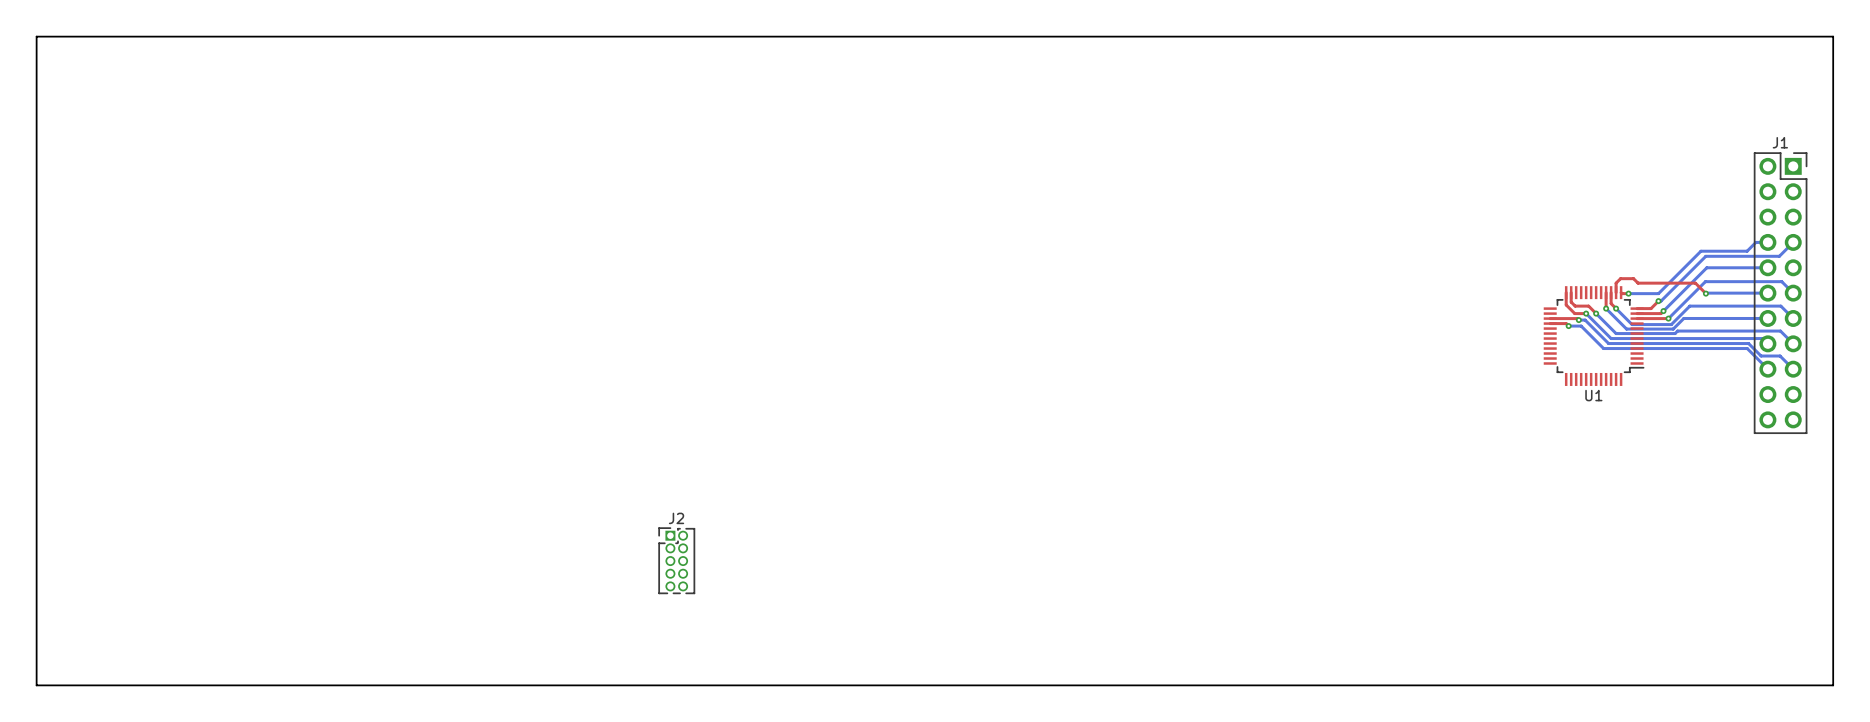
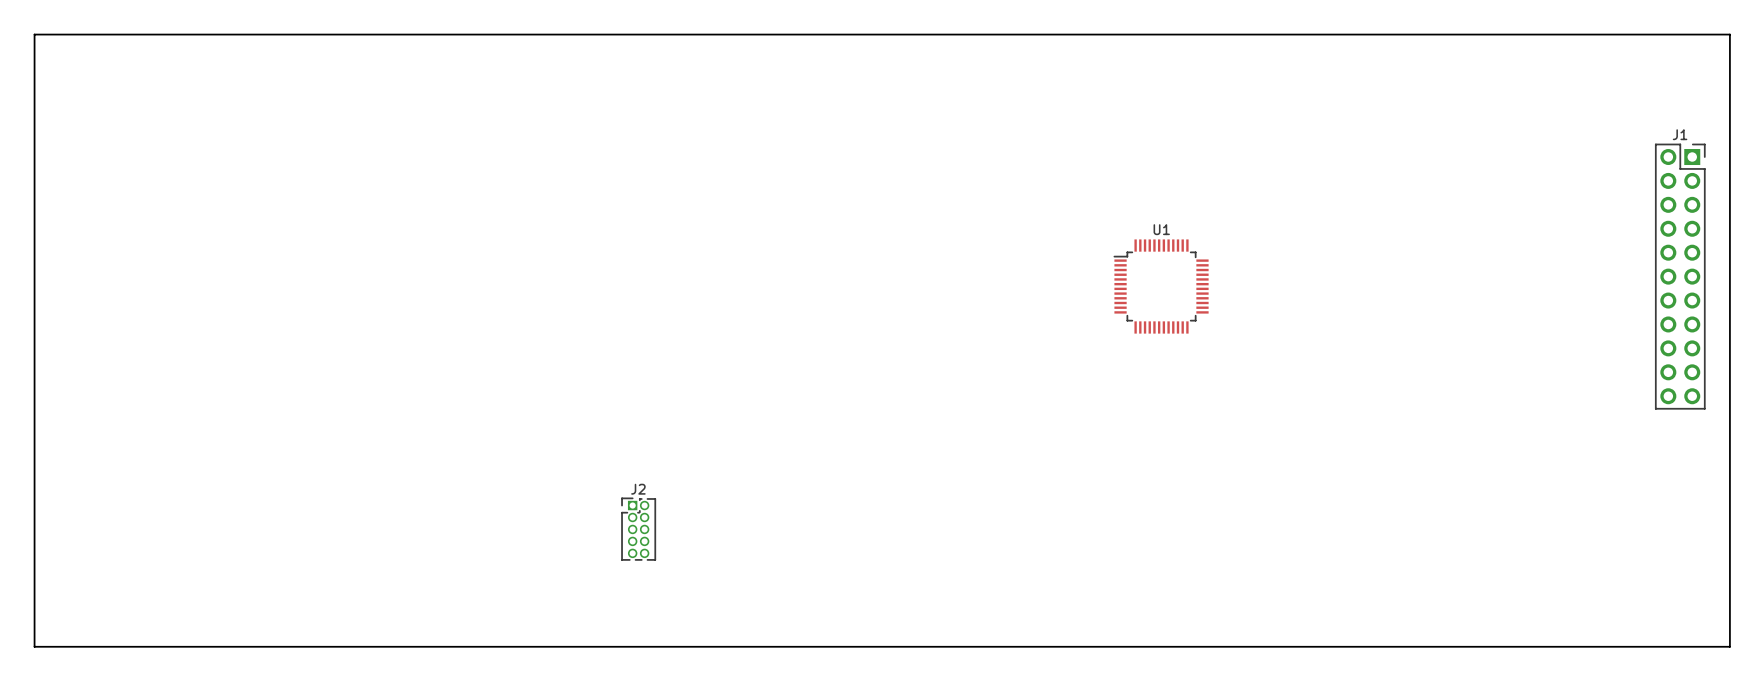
bottom track: (1767, 242) (1755, 242) (1747, 251) (1700, 251) (1658, 293) (1628, 293) -> none
bottom track: (1793, 242) (1779, 256) (1705, 256) (1661, 301) (1658, 301) -> none
bottom track: (1767, 267) (1706, 267) (1663, 311) -> none
top track: (1566, 292) (1566, 304) (1574, 313) (1586, 313) -> none
top track: (1571, 292) (1571, 302) (1575, 306) (1588, 306) (1596, 313) -> none
top track: (1606, 292) (1606, 308) -> none
top track: (1611, 292) (1611, 303) (1616, 308) -> none
top track: (1616, 292) (1616, 283) (1620, 278) (1633, 278) (1638, 283) (1695, 283) (1705, 293) -> none
top track: (1621, 292) (1628, 293) -> none
via: (1628, 293) -> none
via: (1705, 293) -> none
bottom track: (1767, 293) (1705, 293) -> none
bottom track: (1793, 293) (1781, 281) (1705, 281) (1668, 318) -> none
top track: (1658, 301) (1651, 308) (1637, 308) -> none
via: (1658, 301) -> none
bottom track: (1606, 308) (1626, 329) (1673, 329) (1683, 318) (1767, 318) -> none
via: (1606, 308) -> none
bottom track: (1616, 308) (1632, 324) (1671, 324) (1689, 306) (1780, 306) (1793, 318) -> none
via: (1616, 308) -> none
top track: (1663, 311) (1661, 313) (1637, 313) -> none
via: (1663, 311) -> none
bottom track: (1586, 313) (1611, 338) (1762, 338) (1767, 343) -> none
via: (1586, 313) -> none
bottom track: (1596, 313) (1616, 333) (1675, 333) (1677, 331) (1780, 331) (1793, 343) -> none
via: (1596, 313) -> none
top track: (1550, 318) (1578, 320) -> none
top track: (1637, 318) (1668, 318) -> none
via: (1668, 318) -> none
bottom track: (1578, 320) (1585, 320) (1608, 343) (1748, 343) (1761, 356) (1780, 356) (1793, 369) -> none
via: (1578, 320) -> none
top track: (1550, 323) (1566, 323) (1568, 326) -> none
bottom track: (1568, 326) (1581, 326) (1603, 348) (1747, 348) (1767, 369) -> none
via: (1568, 326) -> none
U1 rotation: 0° (1594, 336) -> 180° (1161, 286)
U1 position: (1594, 336) -> (1161, 286)

